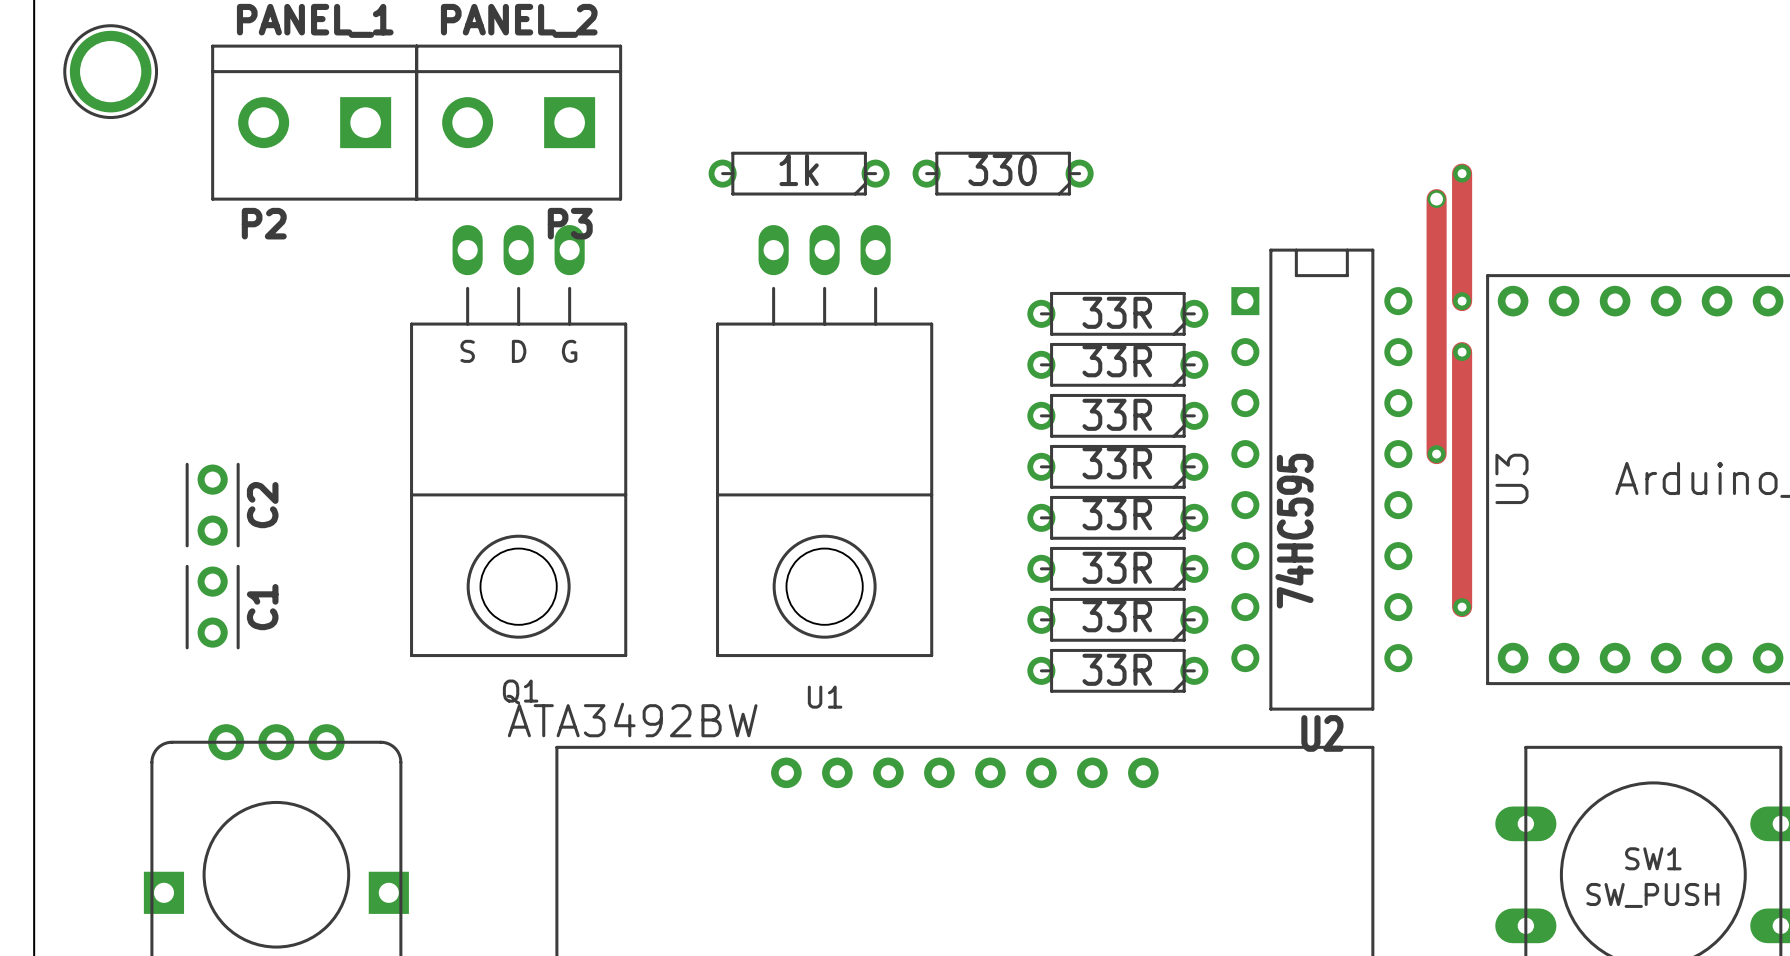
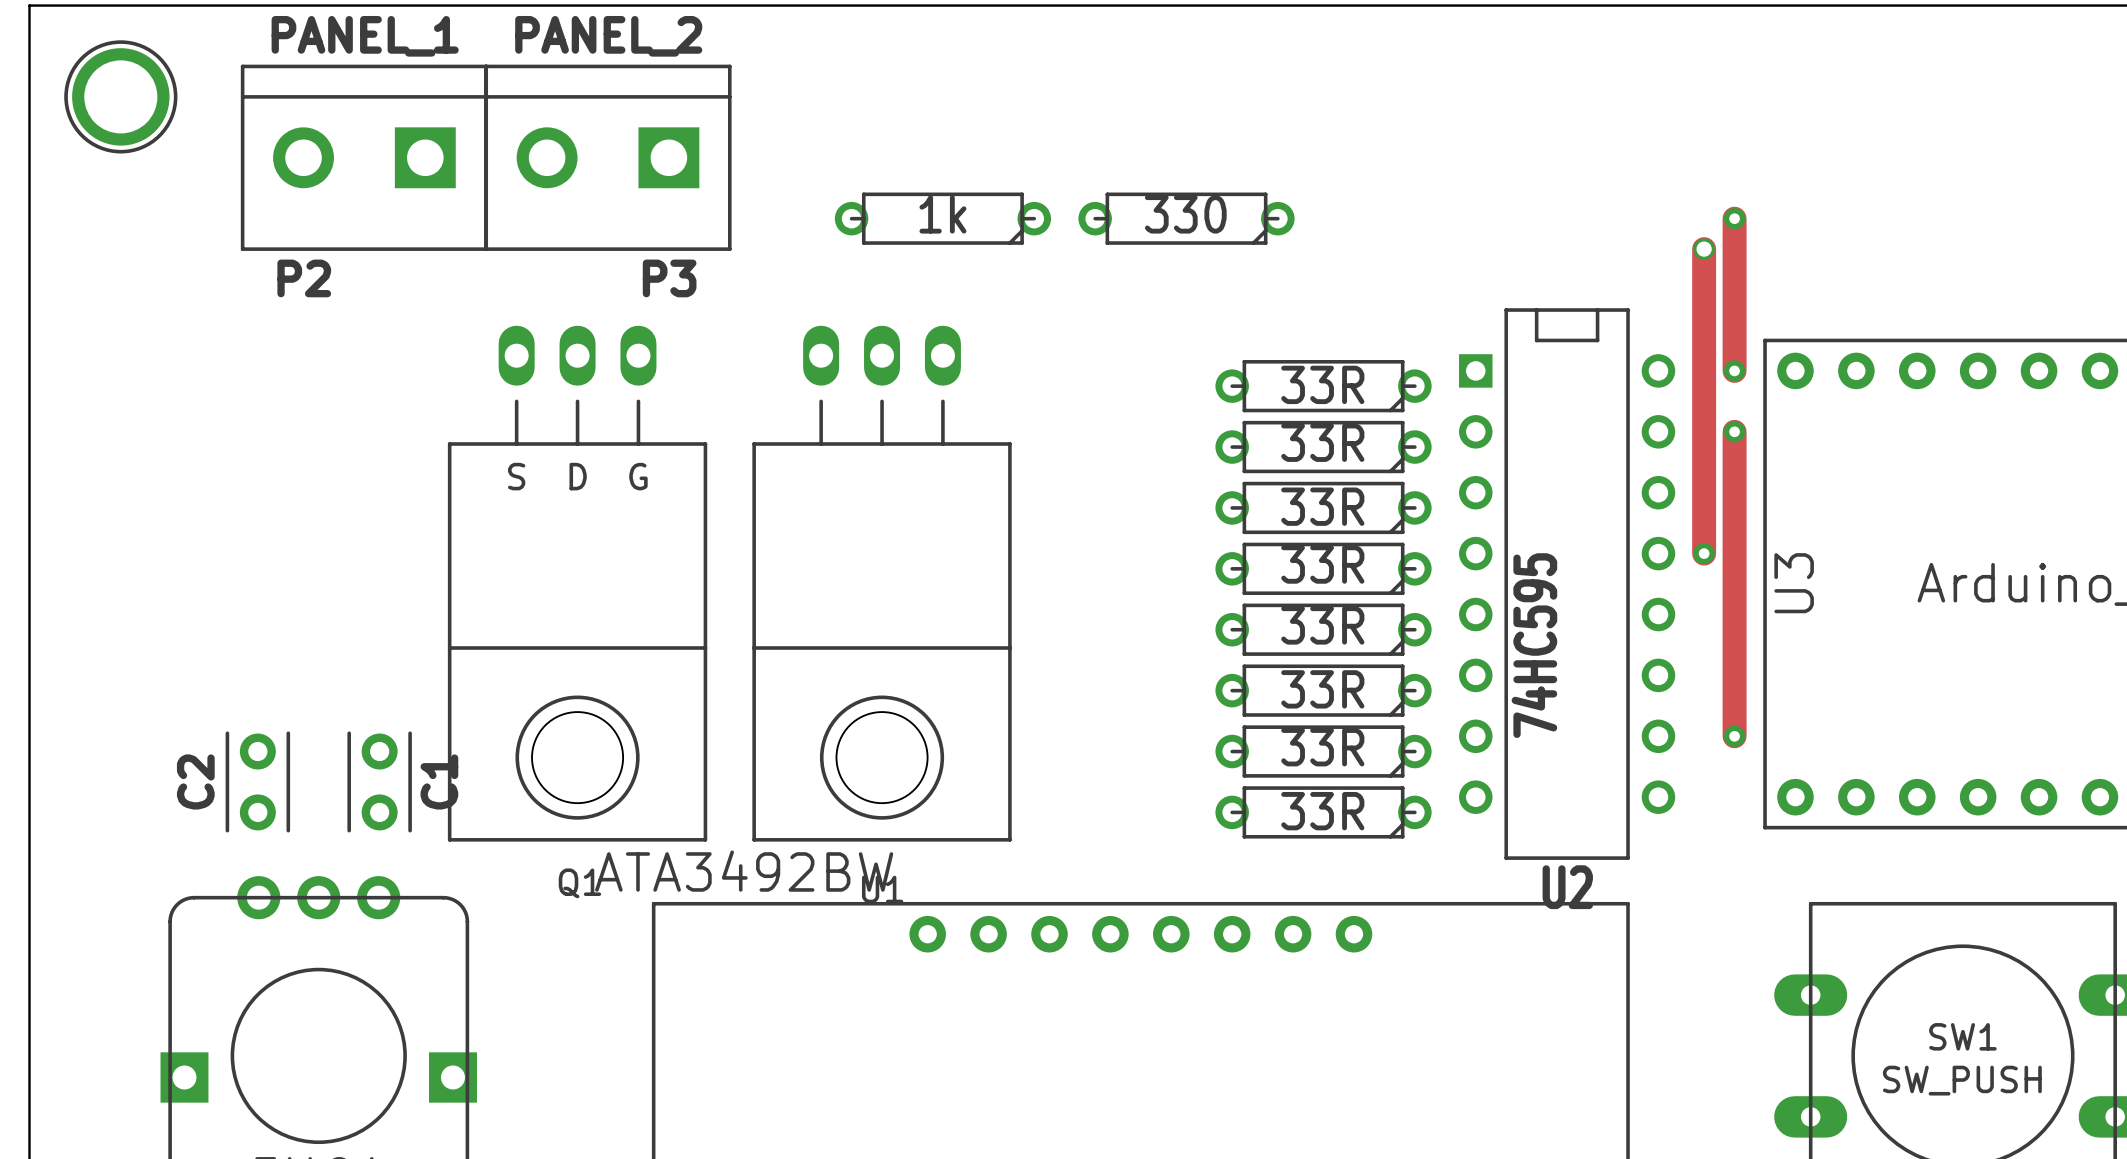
Q1 position: (518, 441) -> (577, 583)
U1 position: (824, 441) -> (882, 583)
C2 position: (212, 505) -> (257, 781)
C2 name position: C2 (262, 505) -> C2 (195, 781)
C1 position: (212, 607) -> (379, 781)

